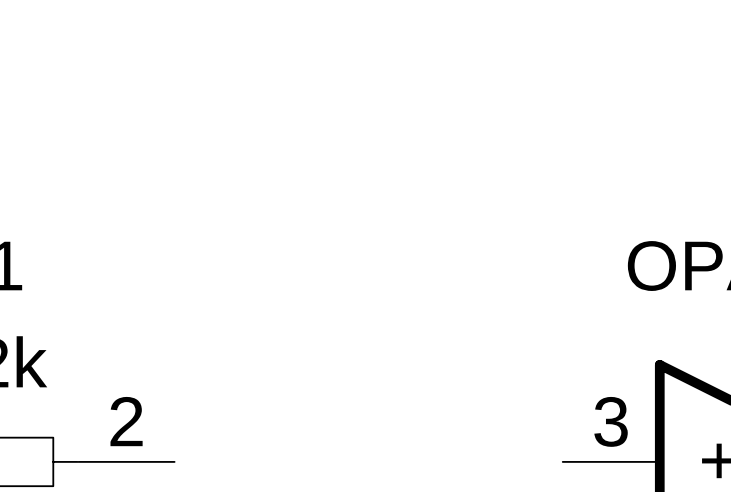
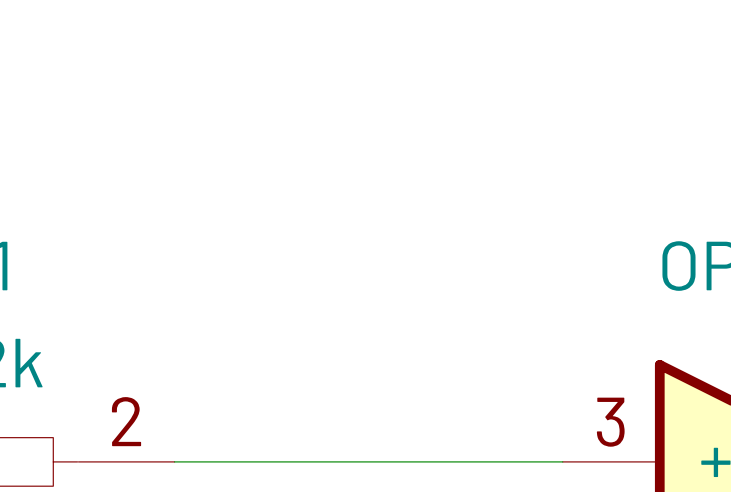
wire: none -> (174, 461) (562, 461)

